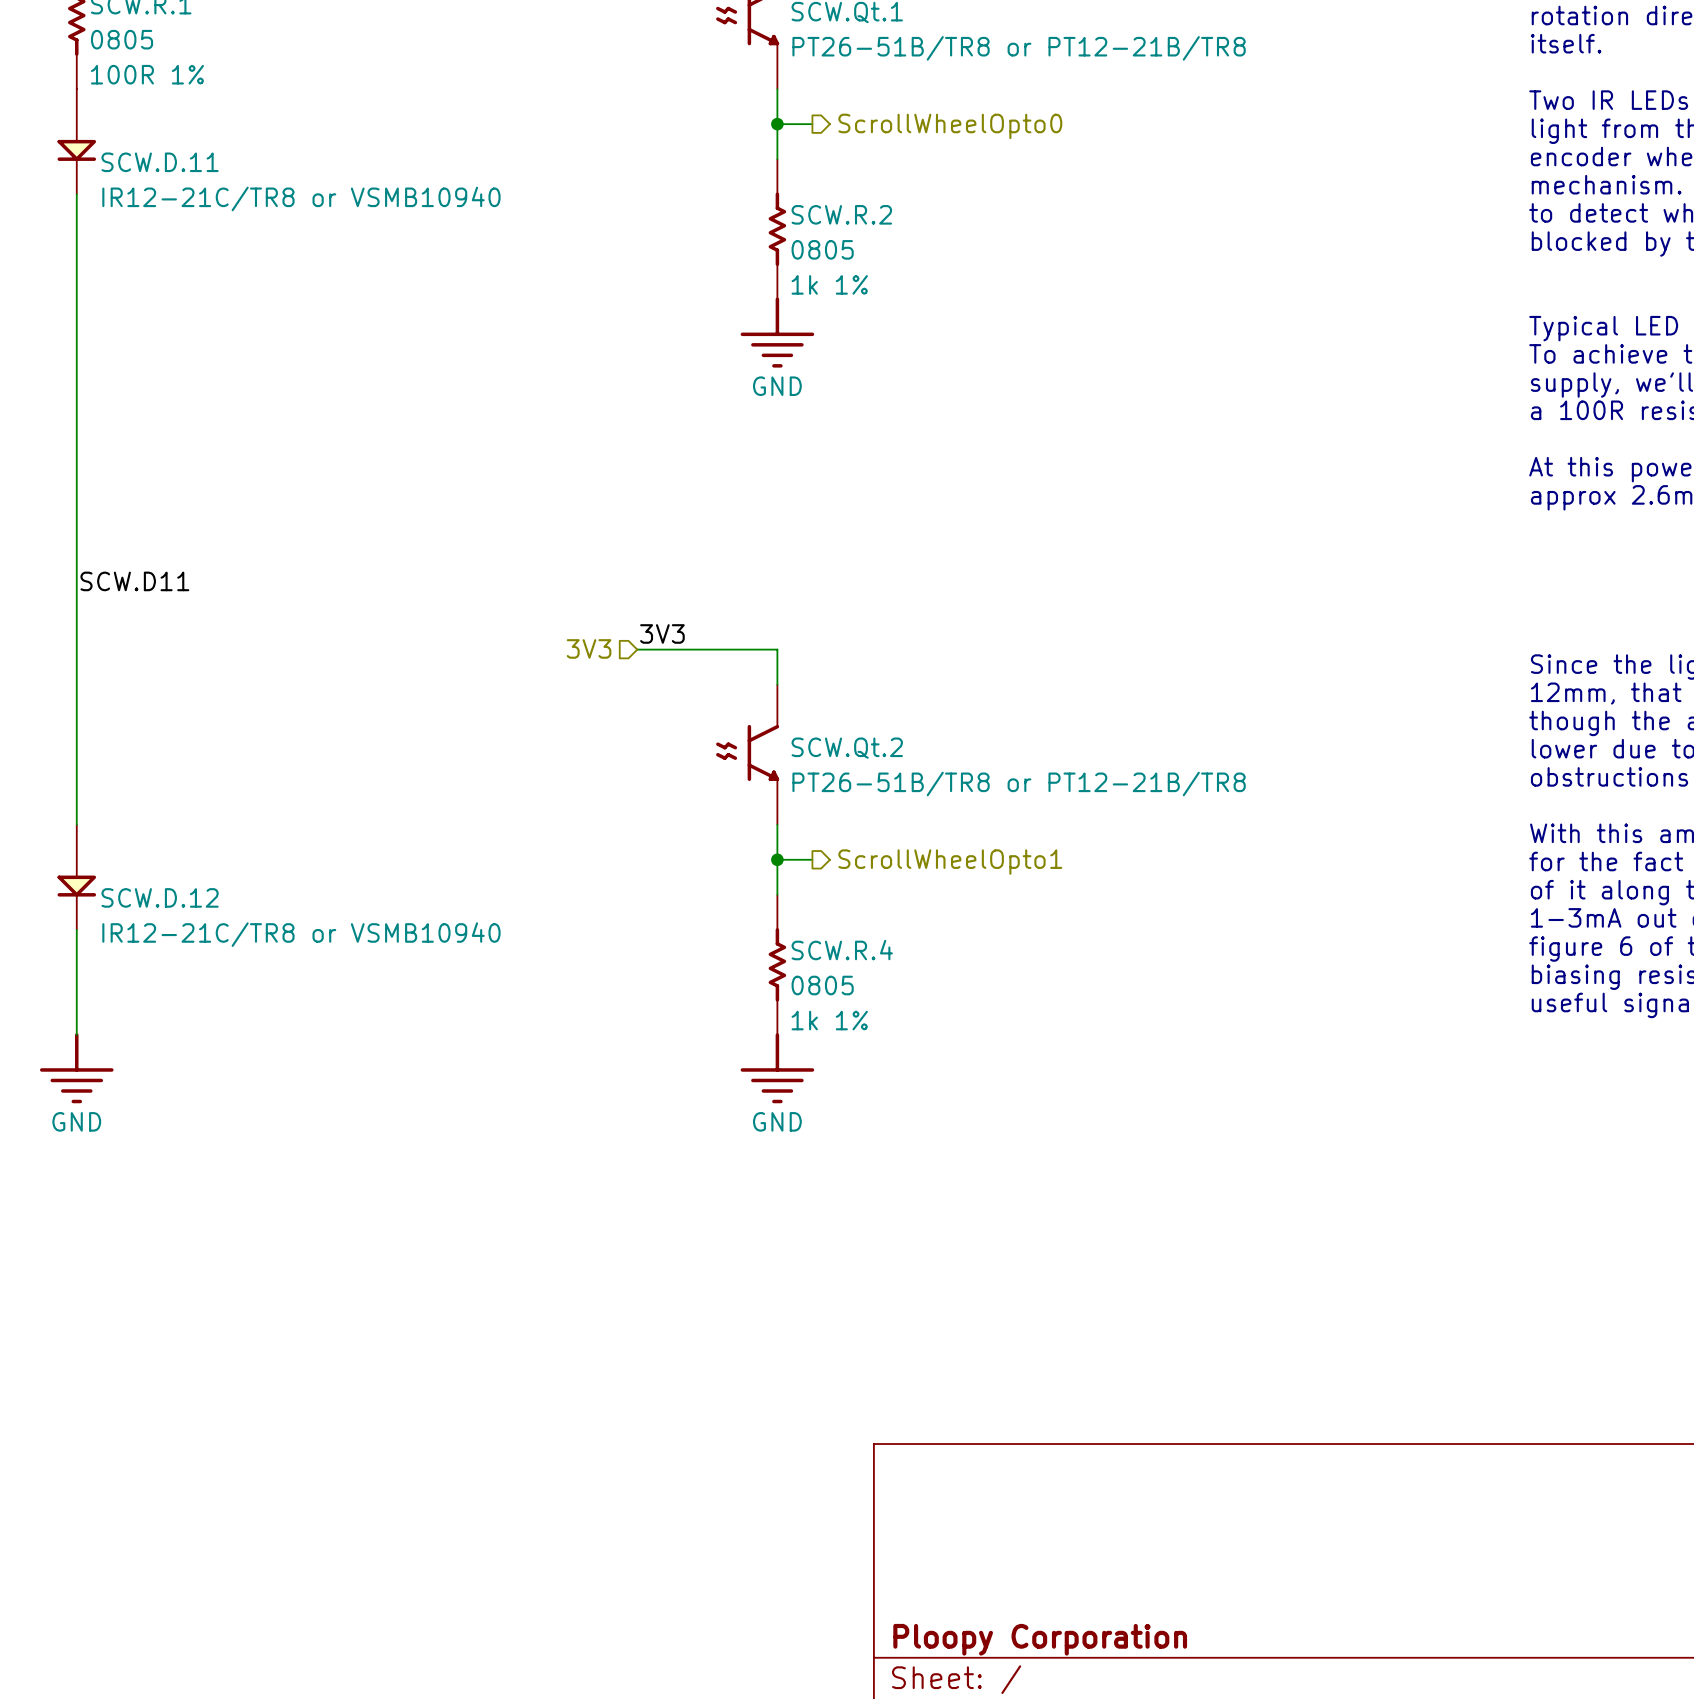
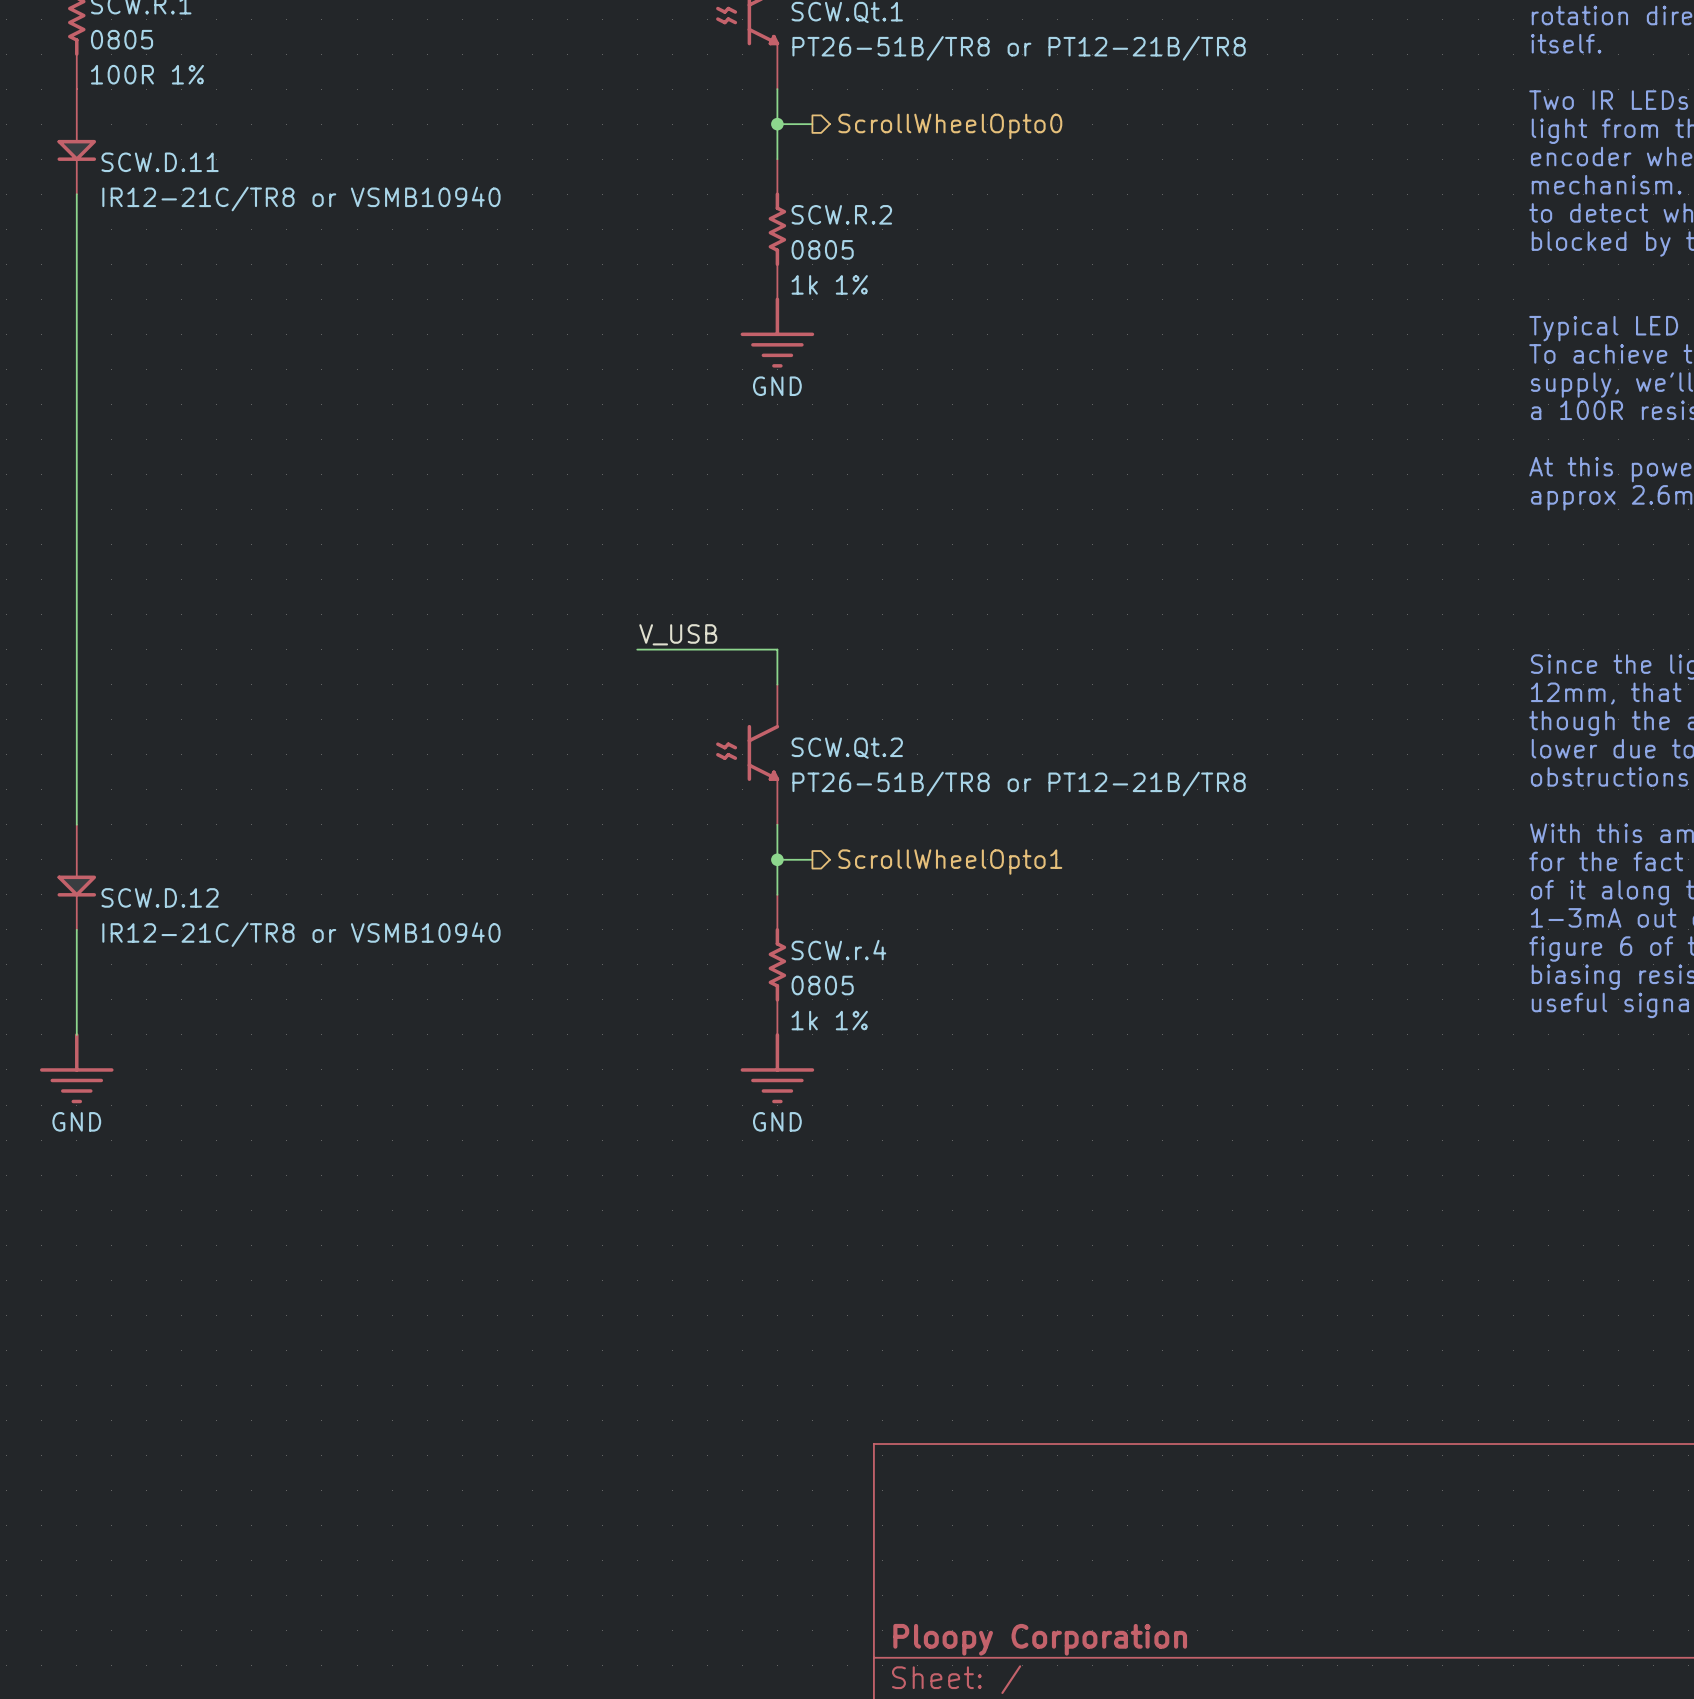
label: SCW.D11 (134, 581) -> none
label: 3V3 (662, 633) -> V_USB (678, 634)
hierarchical label: 3V3 (589, 648) -> none
SCW.R.4 name: SCW.R.4 (842, 950) -> SCW.r.4 (838, 950)

